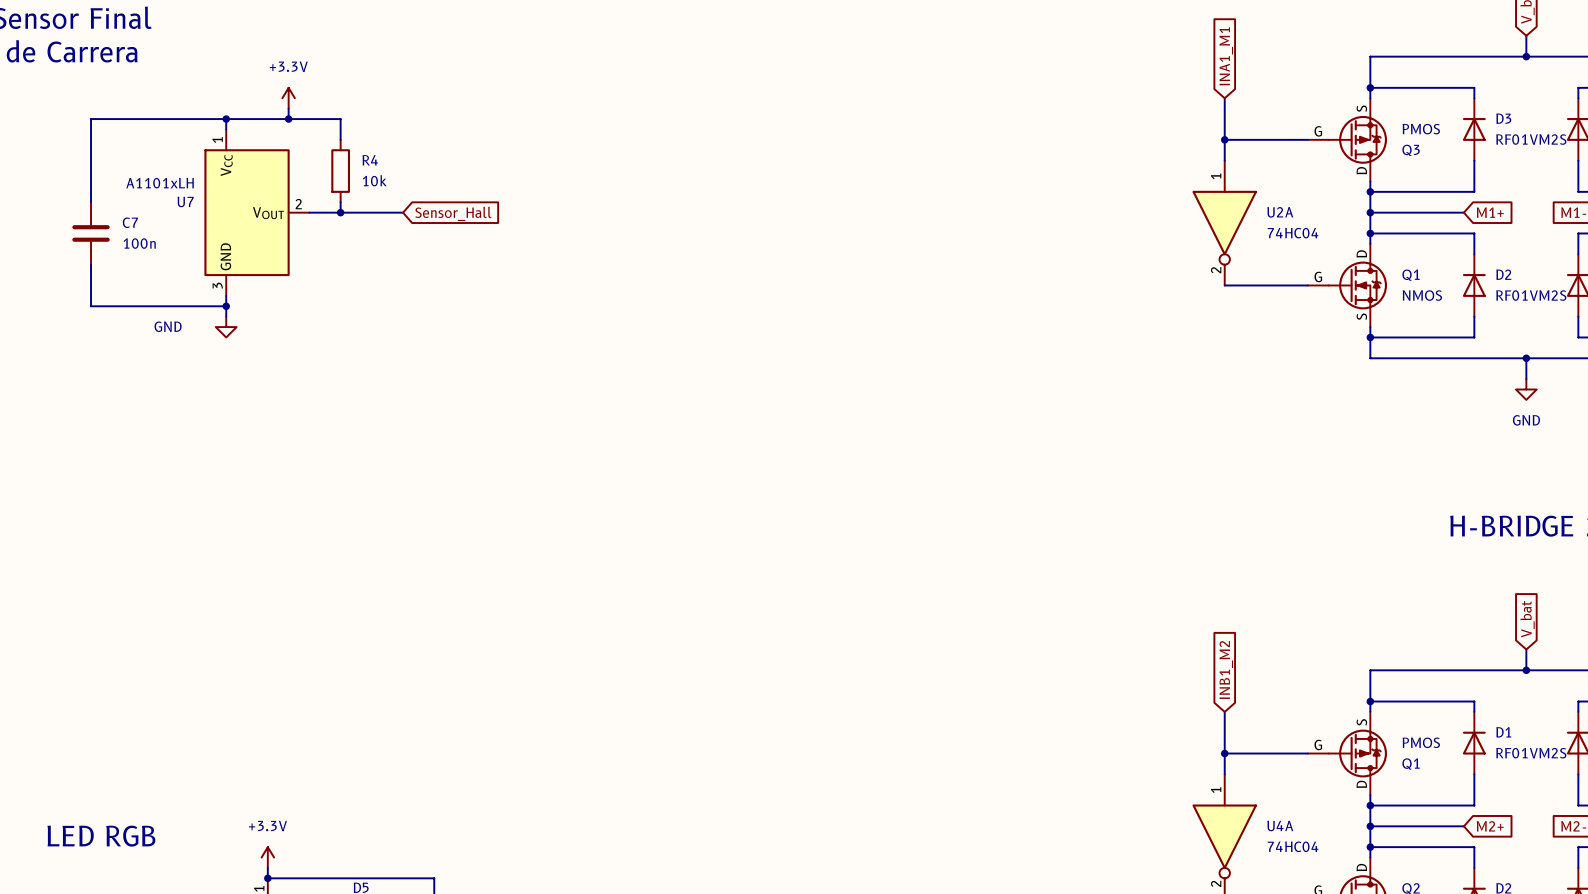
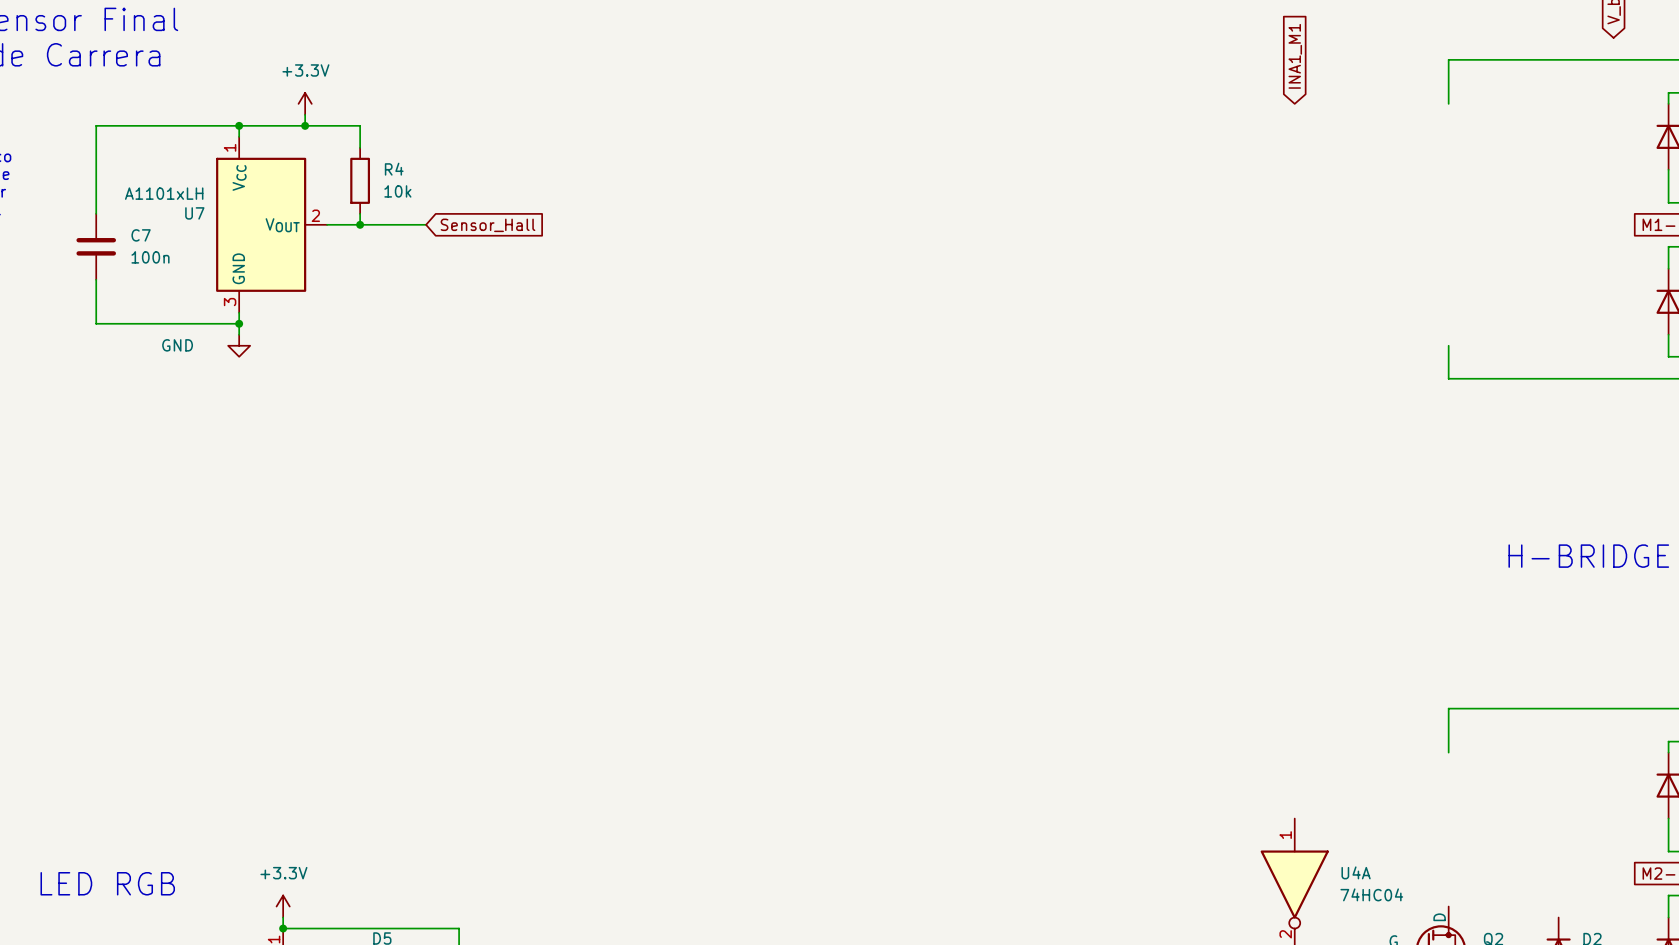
wire: (1526, 35) (1526, 56) -> none
junction: (1526, 56) -> none
wire: (1370, 87) (1474, 87) (1474, 98) -> none
junction: (1370, 87) -> none
wire: (1224, 98) (1224, 160) -> none
D3: RF01VM2S (1474, 129) -> none
wire: (1224, 139) (1307, 139) -> none
junction: (1224, 139) -> none
Q3: PMOS (1347, 139) -> none
wire: (1474, 160) (1474, 191) (1370, 191) -> none
wire: (1370, 181) (1370, 243) -> none
junction: (1370, 191) -> none
wire: (1370, 212) (1463, 212) -> none
junction: (1370, 212) -> none
global label: M1+ (1490, 212) -> none
U2A: 74HC04 (1224, 223) -> none
wire: (1370, 233) (1474, 233) (1474, 254) -> none
junction: (1370, 233) -> none
wire: (1224, 285) (1307, 285) -> none
Q1: NMOS (1347, 285) -> none
D2: RF01VM2S (1474, 285) -> none
wire: (1474, 316) (1474, 337) (1370, 337) -> none
junction: (1370, 337) -> none
wire: (1526, 358) (1526, 379) -> none
junction: (1526, 358) -> none
power symbol: GND (1526, 389) -> none
global label: V_bat (1527, 619) -> none
wire: (1526, 649) (1526, 670) -> none
global label: INB1_M2 (1226, 670) -> none
junction: (1526, 670) -> none
wire: (1370, 701) (1474, 701) (1474, 711) -> none
junction: (1370, 701) -> none
wire: (1224, 711) (1224, 774) -> none
D1: RF01VM2S (1474, 743) -> none
wire: (1224, 753) (1307, 753) -> none
junction: (1224, 753) -> none
Q1: PMOS (1347, 753) -> none
wire: (1474, 774) (1474, 805) (1370, 805) -> none
wire: (1370, 795) (1370, 857) -> none
junction: (1370, 805) -> none
wire: (1370, 826) (1463, 826) -> none
junction: (1370, 826) -> none
global label: M2+ (1490, 826) -> none
wire: (1370, 847) (1474, 847) (1474, 867) -> none
junction: (1370, 847) -> none

